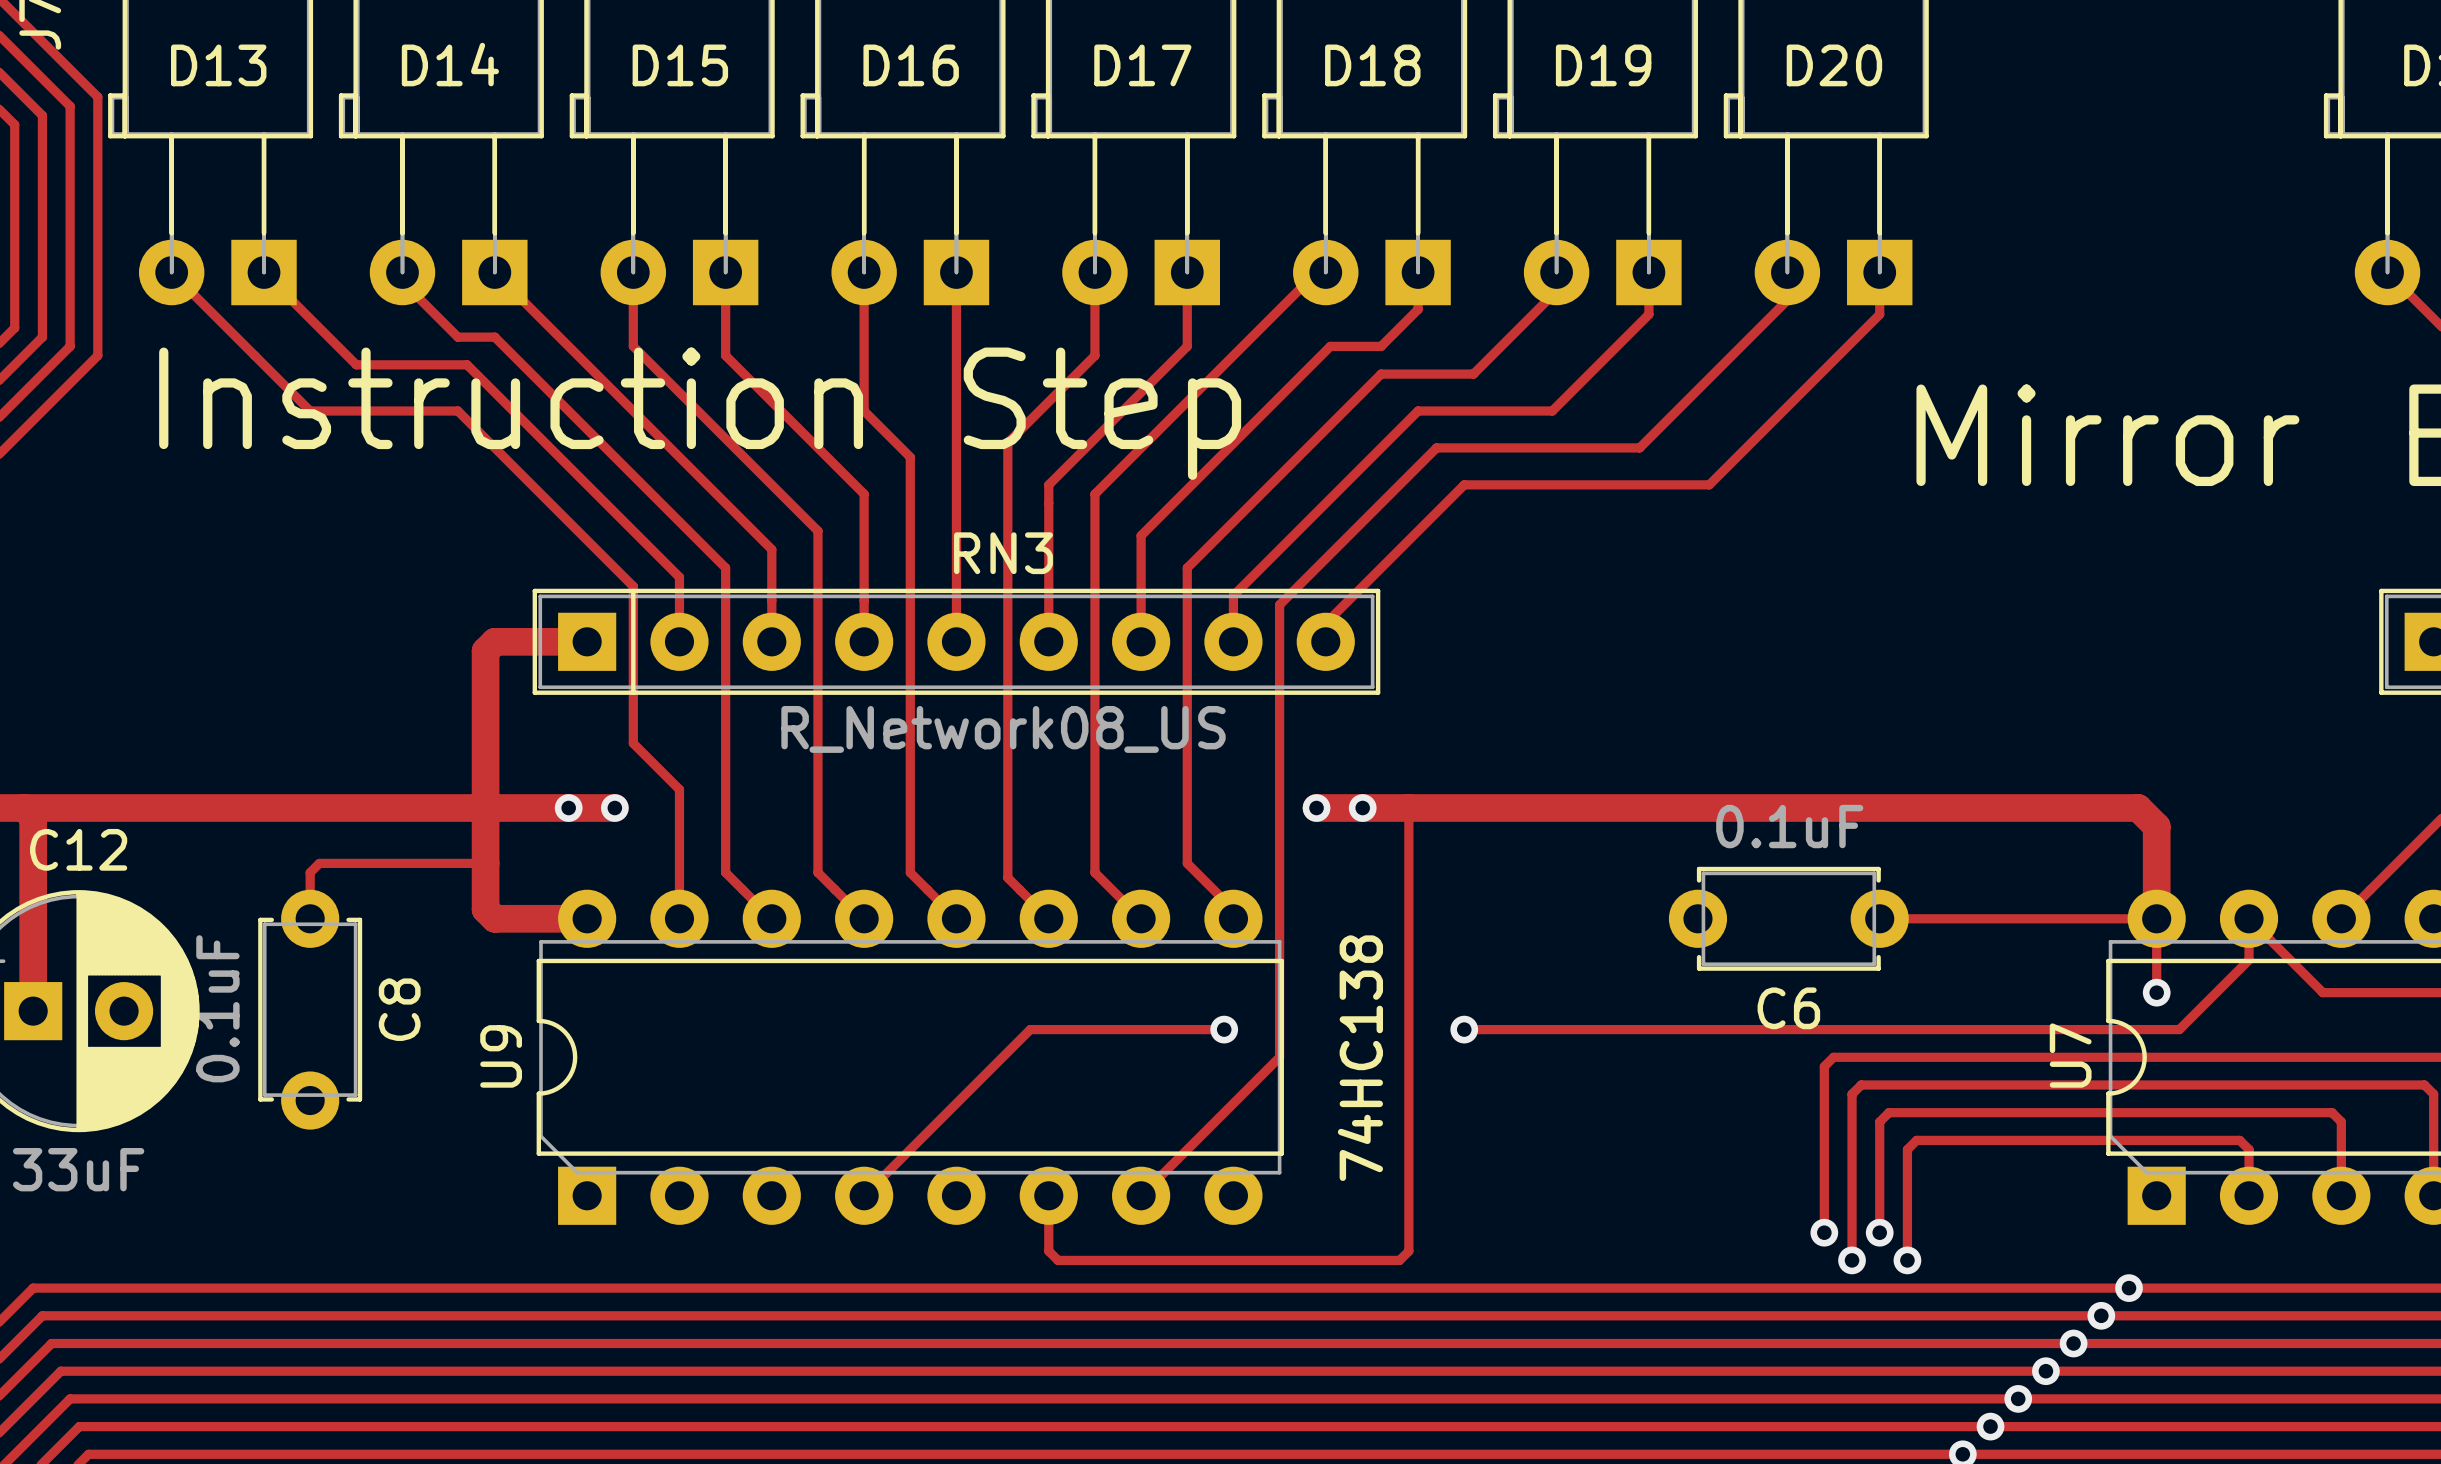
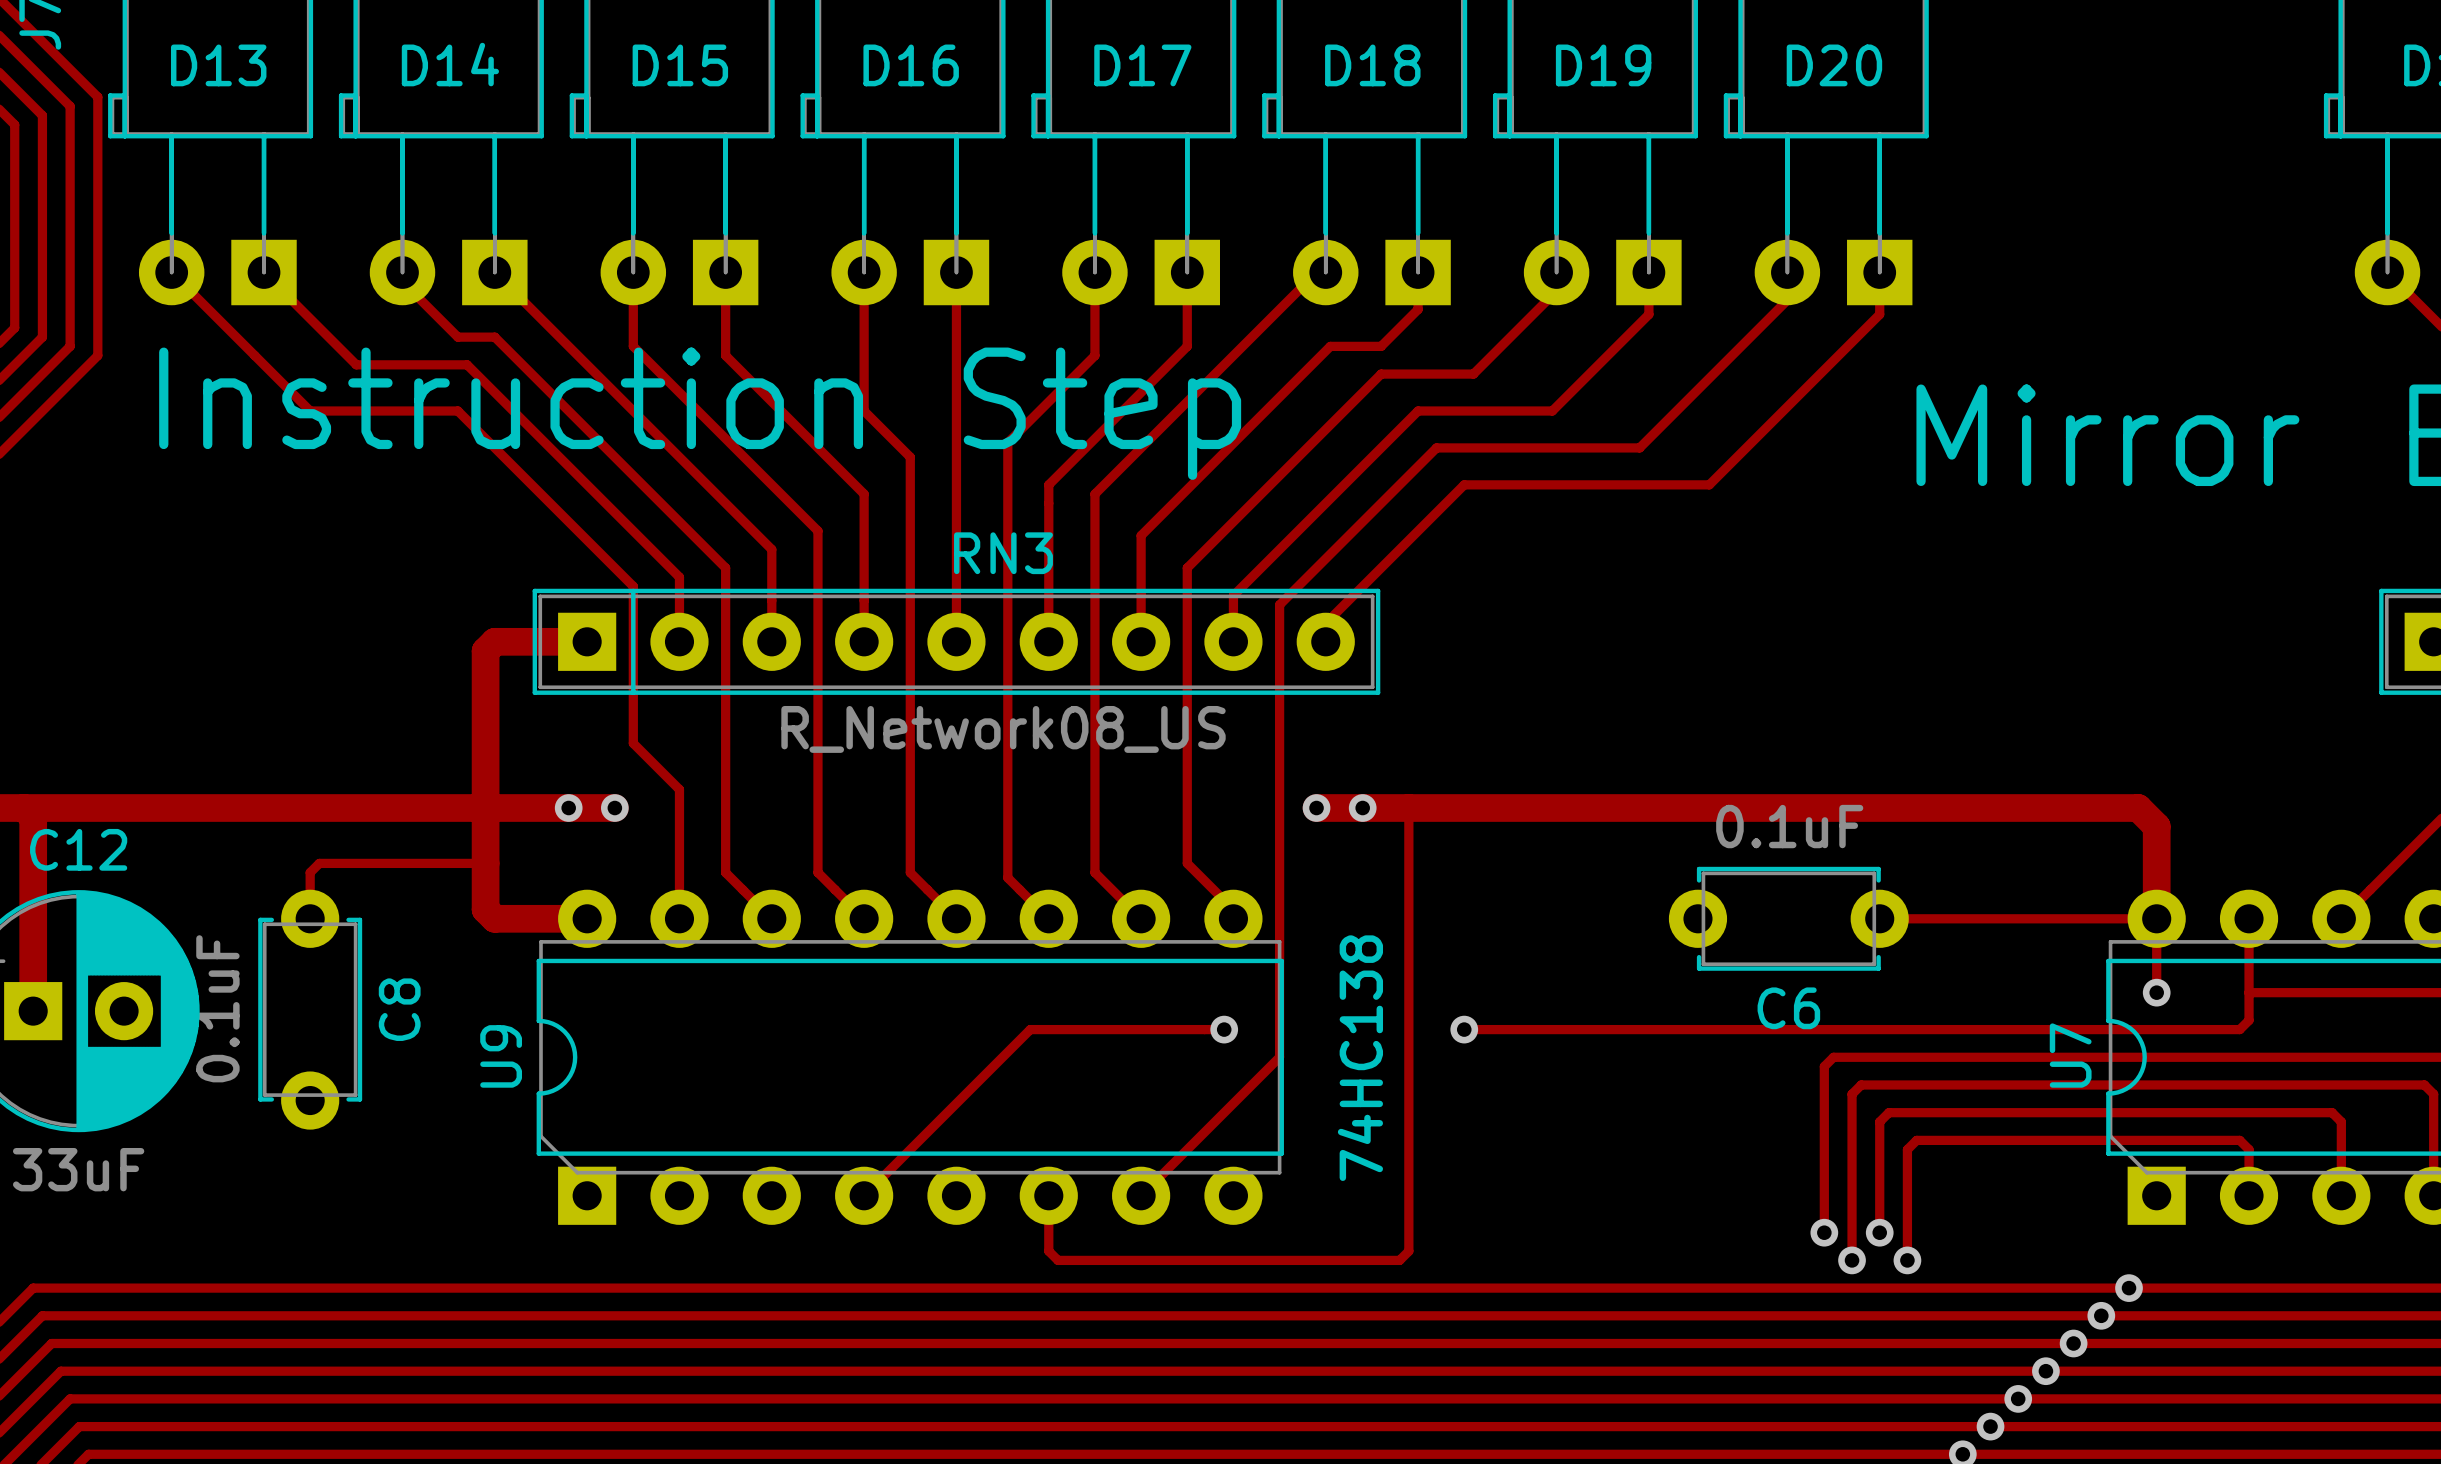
track: (2249, 918) (2322, 992) -> (2249, 992) (2322, 992)
track: (2249, 959) (2179, 1029) -> (2249, 959) (2249, 1020) (2239, 1029) (2179, 1029)

